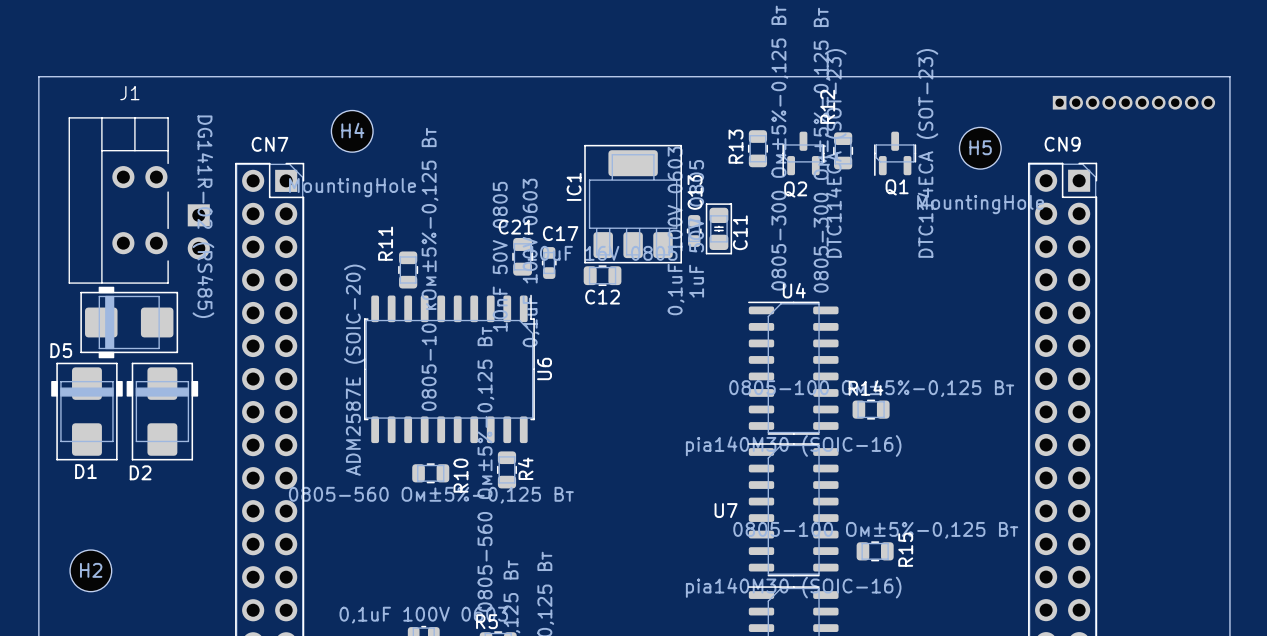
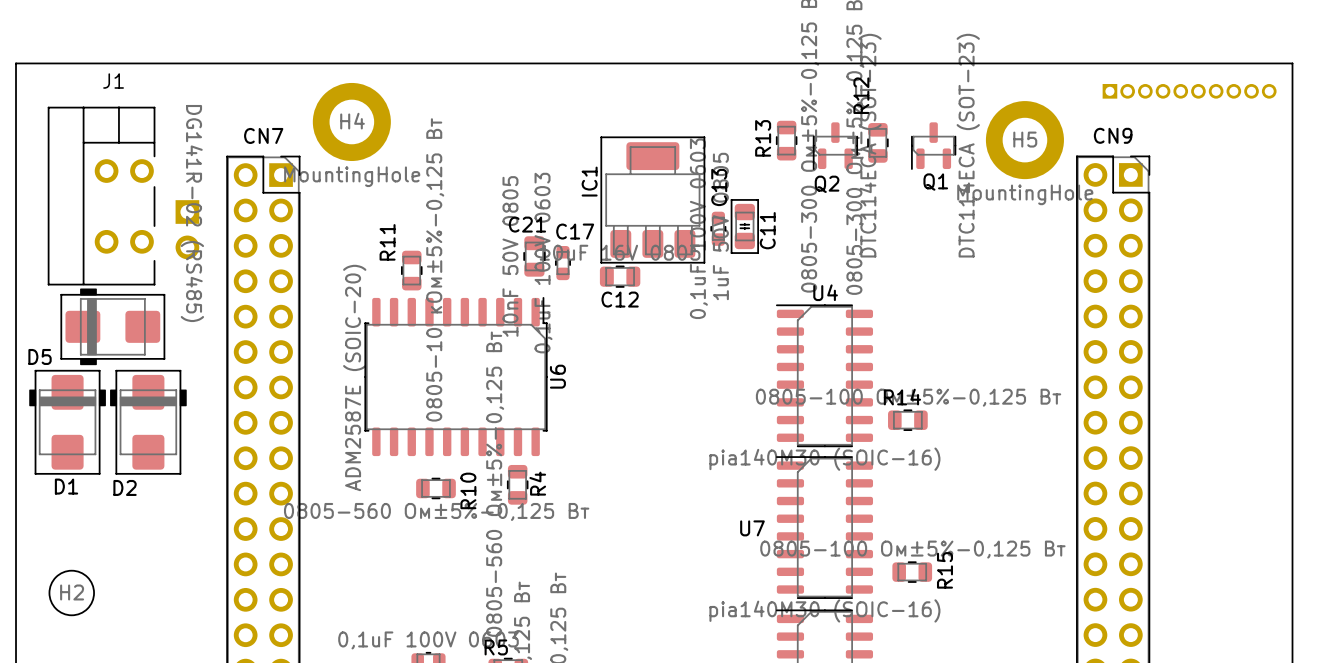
H4 footprint: [331, 110, 374, 153] -> [312, 82, 391, 162]
H5 footprint: [959, 127, 1002, 170] -> [985, 101, 1064, 180]

